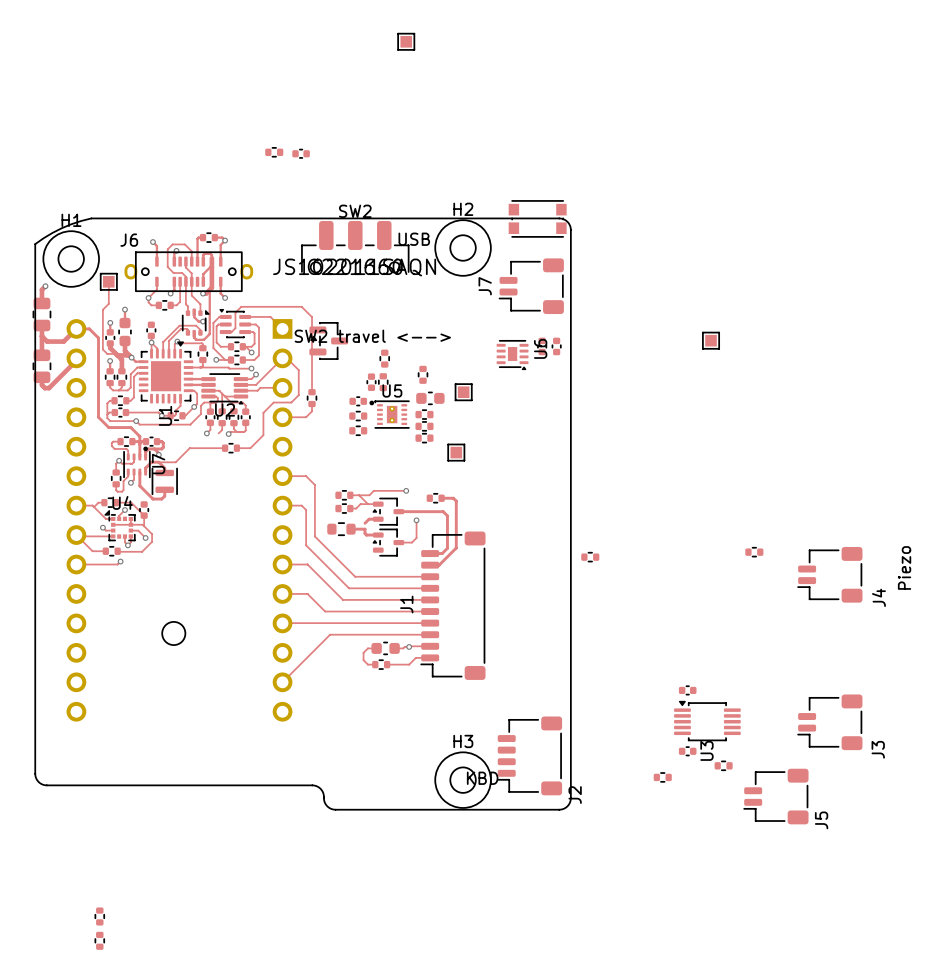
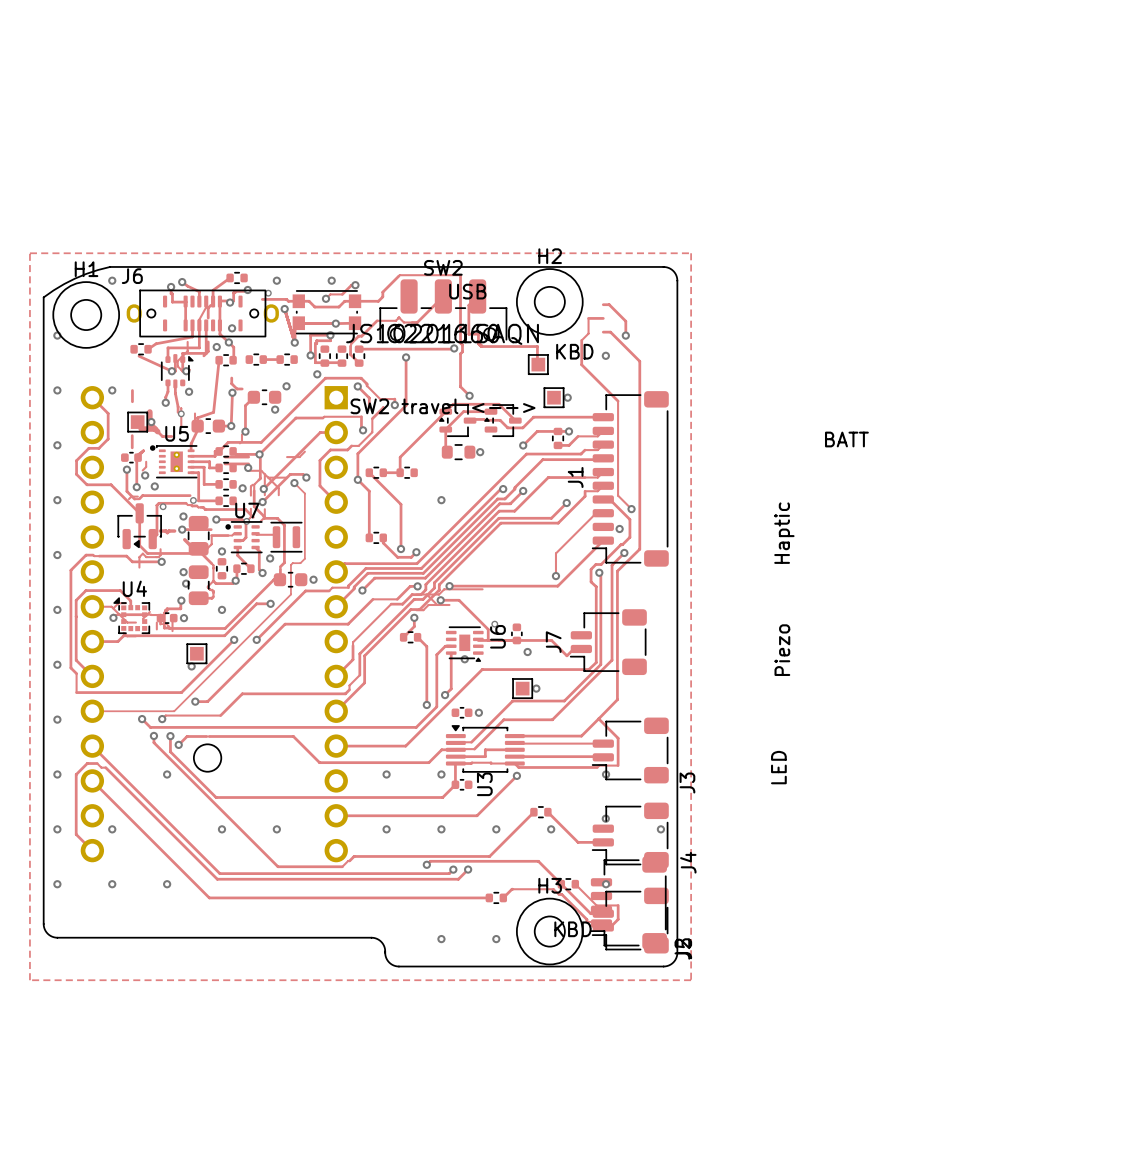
part: (406, 41) -> none
part: (274, 152) -> none
part: (301, 153) -> none
zone outline: none -> (29, 253) (691, 253) (691, 980) (29, 980) (29, 253)
part position: (537, 218) -> (326, 312)
track: none -> (230, 277) (213, 290) (213, 301)
via: none -> (112, 280)
via: none -> (276, 280)
via: none -> (331, 280)
track: none -> (182, 282) (199, 291) (199, 301)
via: none -> (182, 282)
track: none -> (355, 285) (351, 285) (342, 294) (330, 294) (325, 298)
via: none -> (355, 285)
track: none -> (171, 287) (172, 302) (186, 302) (185, 325)
via: none -> (171, 287)
track: (203, 237) (197, 238) (197, 261) -> none
track: none -> (247, 290) (235, 291) (233, 300) (219, 300) (219, 334) (233, 347) (233, 359)
via: none -> (247, 290)
part position: (208, 237) -> (237, 277)
track: (214, 237) (222, 237) (225, 240) (220, 244) (220, 261) -> none
text position: USB (414, 239) -> USB (467, 291)
track: (152, 242) (156, 246) (156, 261) -> none
via: (152, 242) -> none
track: none -> (443, 296) (417, 322) (403, 322) (399, 317)
track: none -> (477, 296) (468, 305) (468, 334) (478, 334) (478, 343) (481, 346) (537, 346) (538, 364)
track: none -> (262, 299) (309, 301) (314, 307) (338, 307) (344, 301) (378, 301) (382, 296) (382, 292) (399, 275) (460, 275) (460, 343) (462, 345) (460, 353) (460, 386) (469, 395)
via: none -> (325, 298)
SW2 position: (355, 246) -> (443, 309)
track: none -> (206, 301) (206, 307) (199, 319) (199, 347) (167, 347) (167, 359)
via: none -> (230, 302)
via: (176, 250) -> none
track: none -> (603, 304) (609, 304) (625, 321) (625, 335)
track: none -> (284, 309) (294, 342) (294, 323) (355, 323)
via: none -> (284, 309)
track: (185, 261) (185, 267) (191, 273) (191, 295) (200, 304) (200, 313) -> none
track: (191, 261) (191, 251) (184, 244) (172, 244) (167, 249) (167, 267) (173, 273) (182, 273) (185, 276) (185, 304) (187, 306) (187, 313) -> none
track: (203, 261) (204, 253) (211, 255) (211, 287) (206, 293) (203, 293) -> none
track: none -> (398, 317) (395, 320) (377, 320) (351, 343) (350, 354) (359, 363)
track: none -> (603, 318) (588, 318) (588, 333) (581, 340) (581, 364) (618, 401) (618, 495) (631, 509)
via: none -> (335, 323)
track: none -> (192, 325) (192, 336) (156, 343) (148, 349)
track: none -> (206, 325) (206, 353) (182, 353) (182, 371) (186, 371)
track: (211, 267) (203, 274) (203, 281) -> none
via: none -> (232, 328)
J6 position: (188, 271) -> (202, 313)
part footprint: [100, 272, 118, 291] -> [130, 343, 152, 356]
track: none -> (603, 332) (610, 332) (639, 361) (639, 549) (617, 571) (617, 699) (598, 718)
via: none -> (57, 335)
via: none -> (330, 335)
via: none -> (625, 335)
track: (108, 281) (108, 303) (102, 309) (102, 349) (107, 353) (116, 353) -> none
track: (180, 281) (180, 301) (176, 305) (170, 305) -> none
track: (220, 281) (220, 293) (225, 297) -> none
via: none -> (228, 342)
via: none -> (294, 342)
track: (45, 286) (41, 289) (41, 303) -> none
via: (45, 286) -> none
via: none -> (216, 347)
J7 position: (531, 286) -> (608, 642)
track: none -> (454, 348) (359, 349)
via: none -> (454, 348)
track: (209, 288) (209, 333) (203, 339) (196, 339) (194, 333) -> none
text: none -> KBD (574, 351)
track: none -> (139, 356) (171, 371) (175, 371) (175, 358)
via: (170, 293) -> none
via: (203, 293) -> none
track: none -> (310, 355) (310, 335) (330, 335) (330, 340) (316, 340) (315, 362) (342, 363)
via: none -> (310, 355)
part: none -> (324, 356)
part: none -> (342, 356)
part: none -> (359, 356)
via: none -> (605, 355)
track: none -> (406, 357) (406, 405) (357, 453) (357, 479) (369, 491) (369, 537)
via: none -> (406, 357)
part: none -> (256, 359)
track: none -> (263, 359) (280, 359)
part: none -> (287, 359)
via: (148, 297) -> none
track: none -> (219, 360) (213, 412) (197, 417) (197, 430) (191, 443) (191, 450)
part: none -> (226, 360)
via: (225, 297) -> none
part: none -> (538, 364)
part: (164, 305) -> none
via: none -> (171, 371)
via: none -> (186, 371)
track: (125, 309) (125, 323) -> none
via: (125, 309) -> none
via: none -> (317, 374)
part: (41, 314) -> none
track: none -> (167, 382) (165, 402)
track: (225, 316) (219, 316) (213, 322) (213, 348) (225, 360) -> none
track: (245, 316) (270, 316) (282, 328) -> none
track: none -> (175, 383) (178, 412)
via: none -> (286, 386)
track: none -> (357, 386) (369, 397) (369, 407)
via: none -> (357, 386)
via: (203, 321) -> none
via: none -> (57, 390)
via: none -> (112, 390)
via: (110, 322) -> none
via: none -> (189, 391)
part position: (195, 323) -> (177, 371)
part: (235, 323) -> none
track: none -> (232, 392) (231, 426) (218, 426)
via: none -> (232, 392)
track: (225, 324) (218, 324) (216, 326) (216, 342) (220, 346) (231, 346) -> none
track: (245, 324) (255, 324) (259, 327) (259, 355) (254, 360) (242, 360) -> none
via: none -> (469, 395)
track: (41, 328) (41, 355) -> none
track: none -> (92, 397) (108, 413) (108, 439) (98, 448) (88, 448) (76, 460) (76, 474) (86, 484) (111, 484) (139, 513) (139, 545) (147, 553) (194, 553) (198, 548) (207, 548) (211, 544) (211, 535) (237, 533)
track: none -> (253, 397) (245, 405) (245, 431)
part: none -> (264, 397)
part: none -> (554, 397)
via: none -> (567, 397)
part: (151, 330) -> none
part: (125, 332) -> none
track: (187, 332) (186, 328) (180, 328) (168, 340) (168, 353) -> none
track: (200, 332) (196, 325) (179, 325) (163, 342) -> none
track: (225, 332) (231, 332) (235, 328) (235, 312) (241, 306) (301, 306) (312, 317) (312, 392) -> none
track: (245, 332) (254, 333) (254, 343) (251, 346) (242, 346) -> none
via: none -> (165, 402)
track: none -> (394, 405) (394, 399) (380, 399) (361, 378) (325, 378) (261, 442) (228, 442) (219, 451) (215, 451) (215, 456) (191, 456)
via: none -> (394, 405)
track: (41, 336) (47, 341) (63, 341) (76, 328) (89, 328) (98, 338) (98, 417) (108, 427) (130, 427) (139, 436) (139, 457) -> none
part: (110, 337) -> none
via: none -> (275, 409)
part: (328, 340) -> none
track: none -> (491, 411) (463, 411) (445, 429) (447, 452)
part: (711, 340) -> none
via: (177, 341) -> none
track: (151, 342) (157, 348) (157, 353) -> none
track: (110, 343) (110, 348) (121, 359) (121, 371) -> none
track: none -> (603, 417) (533, 417) (522, 427) (507, 427) (500, 420) (470, 420)
part: (236, 346) -> none
track: (245, 346) (251, 352) -> none
part: (542, 346) -> none
part: (556, 346) -> none
track: (202, 348) (201, 343) (179, 343) (177, 341) (174, 344) (174, 353) -> none
part: none -> (457, 420)
part: none -> (502, 420)
track: none -> (515, 420) (499, 404) (453, 404) (400, 457) (400, 472) (383, 472)
part: none -> (137, 422)
via: none -> (151, 422)
part: none -> (208, 426)
via: none -> (231, 426)
via: (251, 352) -> none
part: (202, 354) -> none
U6 position: (512, 355) -> (464, 644)
track: none -> (363, 430) (361, 416) (295, 418) (259, 454)
via: none -> (363, 430)
track: none -> (603, 430) (597, 436) (578, 436) (569, 445) (558, 445)
via: (131, 357) -> none
via: none -> (245, 431)
track: none -> (569, 431) (537, 431) (523, 445)
via: none -> (569, 431)
track: (76, 358) (76, 360) (49, 388) (44, 388) (41, 385) (41, 377) -> none
track: none -> (336, 432) (320, 432) (263, 489)
part: (384, 358) -> none
track: (216, 359) (231, 360) -> none
via: (216, 359) -> none
part: (236, 360) -> none
via: (110, 361) -> none
part: none -> (558, 438)
text: none -> BATT (846, 439)
part: (41, 366) -> none
track: (143, 367) (137, 367) (130, 374) (130, 387) (127, 390) (113, 390) (110, 387) (110, 383) -> none
track: (188, 367) (251, 368) -> none
part footprint: [105, 368, 116, 387] -> [121, 451, 142, 464]
via: (251, 368) -> none
via: none -> (57, 445)
via: none -> (523, 445)
U1: (166, 372) -> none
track: (143, 373) (137, 373) (133, 376) (133, 397) (130, 400) (126, 400) -> none
part footprint: [378, 373, 389, 392] -> [441, 444, 476, 461]
part: none -> (226, 451)
track: none -> (233, 451) (236, 454) (259, 454)
via: (256, 374) -> none
via: none -> (480, 452)
part: (423, 374) -> none
track: none -> (259, 454) (260, 478) (254, 484) (254, 506) (264, 518) (277, 518) (284, 525) (284, 562) (280, 566) (280, 579) (273, 579) (225, 628) (169, 628)
via: none -> (259, 454)
part: (121, 377) -> none
track: none -> (138, 457) (138, 454) (143, 450) (136, 457) (136, 487)
part: (371, 382) -> none
track: none -> (191, 461) (209, 461) (209, 467) (219, 467)
track: (240, 384) (256, 384) (282, 358) (286, 358) (298, 370) (298, 395) (291, 402) (273, 402) (263, 412) (263, 435) (250, 448) (236, 448) -> none
track: none -> (191, 467) (204, 467) (204, 484) (219, 484)
track: (282, 387) (260, 387) (257, 390) (240, 390) -> none
part: none -> (226, 467)
via: none -> (248, 467)
U2: (224, 388) -> none
track: none -> (126, 469) (126, 491) (134, 499) (139, 499) (142, 495) (190, 495)
via: none -> (126, 469)
track: (188, 390) (194, 390) (197, 393) (197, 404) (185, 415) (182, 415) -> none
track: none -> (191, 472) (198, 472) (198, 500) (219, 500)
track: none -> (369, 472) (401, 504) (401, 549)
part: none -> (407, 472)
part: (463, 392) -> none
via: none -> (145, 475)
track: (208, 396) (216, 396) (217, 401) (204, 402) (200, 405) (200, 414) (190, 424) (139, 424) (136, 421) (110, 421) (107, 418) (107, 403) (109, 400) (114, 400) -> none
track: none -> (306, 477) (303, 474) (290, 474) (262, 502)
via: none -> (306, 477)
track: (180, 398) (180, 405) (176, 410) (174, 415) (161, 415) (158, 412) (125, 412) -> none
via: none -> (357, 479)
part rotation: 0° (312, 398) -> 90° clockwise (376, 472)
part: (430, 398) -> none
part: (120, 400) -> none
track: none -> (294, 483) (304, 493) (304, 558) (300, 563) (290, 564) (290, 594) (174, 711) (92, 711)
via: none -> (294, 483)
part: (358, 401) -> none
part: none -> (226, 484)
track: (231, 402) (242, 402) (245, 405) (245, 411) -> none
via: none -> (154, 486)
via: none -> (136, 487)
track: (312, 404) (312, 411) (306, 417) (282, 417) -> (383, 407) (372, 418) (372, 432) (358, 445) (351, 445) (347, 449) (330, 449) (319, 460) (319, 485) (336, 502)
via: none -> (242, 488)
via: (194, 406) -> none
via: none -> (263, 489)
track: none -> (503, 489) (500, 489) (421, 568) (365, 568) (348, 587) (332, 587) (329, 590) (305, 590) (256, 639)
via: none -> (503, 489)
track: none -> (523, 490) (510, 503) (499, 503) (425, 578) (374, 578) (362, 590)
via: none -> (523, 490)
part: (120, 412) -> none
U5 position: (389, 414) -> (173, 461)
part: (424, 414) -> none
via: none -> (57, 500)
part: (176, 415) -> none
via: none -> (441, 500)
part: none -> (226, 500)
part: (358, 416) -> none
part: (210, 417) -> none
via: none -> (262, 502)
part: (222, 417) -> none
part: (233, 417) -> none
part: (245, 417) -> none
track: none -> (566, 502) (551, 518) (498, 518) (434, 582) (434, 588) (423, 599) (414, 599) (359, 653) (359, 675) (349, 685) (349, 689) (345, 693) (242, 693) (220, 715) (165, 715) (162, 719)
via: none -> (566, 502)
track: (245, 422) (244, 431) (230, 431) (228, 434) -> none
track: (233, 423) (233, 429) (236, 431) -> none
via: none -> (631, 509)
part: (424, 426) -> none
track: none -> (603, 513) (596, 513) (555, 553) (555, 576)
via: none -> (183, 516)
track: none -> (253, 517) (245, 509) (205, 509) (186, 503) (158, 503) (156, 505) (156, 534) (152, 539)
part: (358, 430) -> none
track: none -> (216, 519) (242, 519) (246, 523) (246, 537) (242, 540) (237, 540)
via: none -> (216, 519)
via: (228, 434) -> none
part footprint: [117, 436, 136, 447] -> [117, 503, 162, 550]
part: (424, 438) -> none
via: none -> (619, 528)
track: none -> (182, 529) (211, 529)
via: none -> (182, 529)
track: (120, 441) (113, 441) (111, 446) (114, 448) (126, 448) (128, 457) -> none
part: (151, 441) -> none
track: (157, 441) (161, 441) (163, 447) (148, 448) (145, 451) (145, 457) -> none
track: none -> (255, 533) (276, 534) (276, 537)
part footprint: [221, 443, 241, 454] -> [270, 521, 303, 553]
text: none -> Haptic (784, 533)
part: none -> (198, 535)
part: none -> (376, 537)
track: none -> (383, 537) (383, 543) (397, 557) (411, 557) (416, 552)
track: (225, 448) (189, 448) (175, 462) (158, 462) -> none
track: none -> (603, 540) (557, 586) (449, 586)
part: (456, 452) -> none
via: (158, 454) -> none
track: none -> (237, 547) (237, 555) (250, 568)
track: none -> (255, 547) (259, 551) (259, 569) (262, 573)
track: none -> (198, 548) (213, 565) (213, 581)
via: none -> (401, 549)
via: none -> (221, 551)
via: none -> (416, 552)
via: (119, 460) -> none
track: none -> (624, 552) (612, 565) (612, 660) (552, 719) (503, 719) (474, 749) (441, 749) (428, 762) (319, 762) (293, 736) (187, 736) (178, 744)
via: none -> (624, 552)
via: none -> (57, 555)
U7 rotation: 0° (136, 462) -> 90° counterclockwise (244, 537)
U7 position: (136, 462) -> (244, 537)
via: none -> (270, 558)
track: none -> (161, 561) (132, 561) (126, 556) (86, 555) (70, 570) (70, 667) (76, 673)
via: none -> (161, 561)
part footprint: [151, 467, 178, 495] -> [187, 565, 210, 606]
track: (128, 472) (128, 476) (123, 481) (122, 491) (116, 490) (116, 484) -> none
track: (134, 472) (134, 479) (130, 482) -> none
track: (139, 472) (139, 485) (152, 499) (161, 499) (164, 496) (164, 489) -> none
track: (145, 472) (145, 468) (151, 462) (158, 462) (164, 468) (164, 472) -> none
part: none -> (221, 568)
track: none -> (236, 568) (236, 579) (232, 583) (216, 583) (213, 581)
part: none -> (243, 568)
via: none -> (183, 572)
track: (282, 476) (306, 476) (314, 484) (314, 536) (355, 576) (430, 576) -> (336, 571) (344, 563) (416, 563) (526, 454) (581, 454) (584, 450) (597, 450) (603, 444)
track: none -> (599, 572) (600, 664) (564, 701) (512, 701) (471, 742) (455, 742)
via: none -> (599, 572)
via: none -> (262, 573)
part: (116, 478) -> none
via: none -> (555, 576)
via: (130, 482) -> none
part: none -> (290, 579)
via: none -> (313, 579)
track: none -> (213, 581) (207, 586) (213, 591) (213, 596) (198, 598)
via: none -> (235, 580)
via: none -> (186, 583)
track: none -> (417, 586) (410, 586) (397, 599) (372, 599) (348, 624) (285, 624) (207, 701) (195, 701)
via: none -> (417, 586)
via: none -> (449, 586)
via: (406, 490) -> none
via: none -> (362, 590)
part: (344, 495) -> none
part: (435, 498) -> none
track: (441, 498) (453, 498) (456, 501) (456, 548) (439, 565) (430, 565) -> none
track: none -> (181, 600) (180, 608) (167, 608) (164, 612) (164, 628) (169, 628)
via: none -> (181, 600)
track: none -> (440, 600) (459, 600) (488, 629) (488, 640)
via: none -> (440, 600)
part: (110, 502) -> none
track: (116, 502) (131, 502) (144, 515) -> none
via: none -> (270, 603)
track: (282, 505) (301, 505) (306, 510) (306, 545) (349, 588) (430, 588) -> (336, 606) (367, 573) (423, 573) (497, 498) (504, 498) (542, 459) (603, 458)
via: none -> (57, 609)
via: none -> (221, 609)
part: (344, 508) -> none
via: (125, 510) -> none
part rotation: 0° (144, 510) -> 90° clockwise (167, 618)
part: (388, 511) -> none
track: (398, 511) (443, 511) (447, 515) (447, 548) (442, 553) (430, 553) -> none
track: none -> (414, 617) (414, 626) (403, 637)
via: none -> (414, 617)
track: none -> (113, 617) (113, 615) (117, 614) (160, 615) (160, 624) (166, 624) (169, 628)
via: none -> (113, 617)
via: none -> (183, 618)
track: (378, 519) (369, 519) (365, 523) -> none
track: (416, 520) (416, 537) (411, 542) (398, 542) -> none
part footprint: [327, 522, 356, 536] -> [399, 631, 422, 644]
track: (113, 524) (142, 524) (152, 534) (152, 541) (142, 551) (117, 551) -> none
U4 position: (119, 525) -> (131, 615)
via: (102, 527) -> none
part: none -> (516, 633)
track: (351, 529) (365, 529) (366, 535) (378, 535) -> none
track: (130, 530) (138, 530) (145, 537) -> none
track: none -> (417, 637) (426, 646) (426, 704)
track: none -> (234, 639) (181, 692) (76, 692) (76, 673)
via: none -> (234, 639)
via: none -> (256, 639)
track: none -> (478, 640) (551, 640) (566, 655) (573, 648) (581, 648)
track: (76, 535) (92, 551) (105, 551) -> (92, 641) (117, 641) (123, 635) (224, 635) (256, 603) (270, 603)
track: (77, 536) (113, 536) -> none
track: (130, 536) (130, 542) (127, 545) (124, 542) (124, 536) -> none
via: (145, 537) -> none
track: none -> (451, 646) (445, 646) (436, 654) (436, 706) (416, 727) (150, 727) (142, 719)
part: (388, 542) -> none
via: none -> (527, 652)
track: none -> (451, 653) (451, 688) (445, 695)
via: (127, 545) -> none
part: none -> (196, 653)
via: none -> (464, 659)
part: (111, 551) -> none
part: (754, 552) -> none
via: none -> (57, 664)
via: none -> (191, 666)
part: (590, 557) -> none
track: (120, 561) (117, 564) (76, 564) -> (130, 607) (130, 600) (120, 590) (85, 590) (76, 600) (76, 660) (92, 676)
via: (120, 561) -> none
track: (282, 564) (307, 564) (343, 599) (430, 599) -> (336, 676) (353, 659) (353, 642) (391, 604) (402, 604) (412, 594) (421, 594) (425, 589) (425, 584) (499, 511) (514, 511) (548, 477) (597, 477) (603, 472)
text position: Piezo (904, 567) -> Piezo (782, 650)
part: none -> (522, 688)
via: none -> (536, 688)
J4 position: (829, 574) -> (630, 835)
via: none -> (445, 695)
via: none -> (195, 701)
via: none -> (426, 704)
track: (282, 593) (307, 593) (325, 611) (430, 611) -> (336, 711) (364, 682) (364, 655) (410, 609) (419, 609) (439, 590) (439, 584) (500, 523) (558, 523) (585, 496) (585, 491) (597, 491) (603, 485)
part: none -> (462, 712)
via: none -> (478, 712)
via: none -> (142, 719)
via: none -> (162, 719)
track: none -> (598, 718) (581, 736) (514, 736)
track: none -> (598, 718) (618, 738) (618, 765) (599, 765) (597, 767) (518, 767) (514, 763) (455, 763) (455, 784) (442, 797) (216, 797) (170, 751) (170, 736)
via: none -> (57, 719)
J1 position: (453, 605) -> (630, 478)
track: none -> (153, 735) (153, 742) (278, 866) (342, 866) (354, 856) (489, 856) (533, 812)
via: none -> (153, 735)
via: none -> (170, 736)
track: none -> (514, 742) (603, 743)
via: none -> (178, 744)
track: none -> (92, 746) (219, 873) (449, 873) (453, 869)
track: (430, 623) (282, 623) -> (603, 499) (609, 499) (629, 519) (629, 537) (601, 564) (595, 564) (591, 569) (591, 581) (596, 586) (596, 662) (588, 669) (482, 669) (405, 746) (336, 746)
track: none -> (514, 749) (485, 749) (485, 756) (455, 756)
track: none -> (514, 756) (603, 757)
track: (430, 634) (330, 634) (282, 682) -> (516, 775) (477, 815) (336, 815)
text: none -> LED (778, 767)
via: (409, 646) -> none
track: (430, 646) (394, 648) -> none
via: none -> (57, 774)
via: none -> (167, 774)
via: none -> (386, 774)
via: none -> (441, 774)
via: none -> (606, 774)
track: (376, 648) (367, 648) (363, 652) (363, 660) (367, 664) (375, 664) -> none
part: (385, 648) -> none
via: none -> (516, 775)
track: none -> (92, 780) (209, 897) (489, 897)
part: none -> (462, 784)
track: (430, 657) (415, 657) (409, 664) (387, 664) -> none
part: (381, 664) -> none
part: none -> (540, 812)
track: none -> (547, 812) (578, 842) (603, 842)
via: none -> (605, 818)
part: (687, 690) -> none
via: none -> (57, 829)
via: none -> (112, 829)
via: none -> (221, 829)
via: none -> (276, 829)
via: none -> (386, 829)
via: none -> (441, 829)
via: none -> (496, 829)
via: none -> (551, 829)
via: none -> (660, 829)
track: none -> (92, 850) (76, 834) (76, 774) (87, 763) (97, 763) (101, 767) (105, 767) (217, 879) (458, 879) (468, 869)
U3 position: (707, 720) -> (485, 748)
J3 position: (829, 722) -> (630, 750)
track: none -> (426, 864) (430, 861) (538, 861) (590, 913) (603, 913)
via: none -> (426, 864)
via: none -> (453, 869)
via: none -> (468, 869)
via: none -> (57, 884)
via: none -> (112, 884)
via: none -> (167, 884)
part: none -> (568, 884)
track: none -> (575, 884) (596, 905) (618, 905) (618, 919) (610, 927) (603, 927) (597, 921) (586, 921) (586, 919) (561, 894) (558, 894) (553, 889) (512, 889) (503, 897)
via: none -> (606, 884)
part: none -> (496, 897)
part: (687, 751) -> none
part: (723, 765) -> none
part: (662, 777) -> none
via: none -> (441, 939)
via: none -> (496, 939)
J5 position: (776, 796) -> (630, 920)
part: (99, 916) -> none
part: (99, 940) -> none

